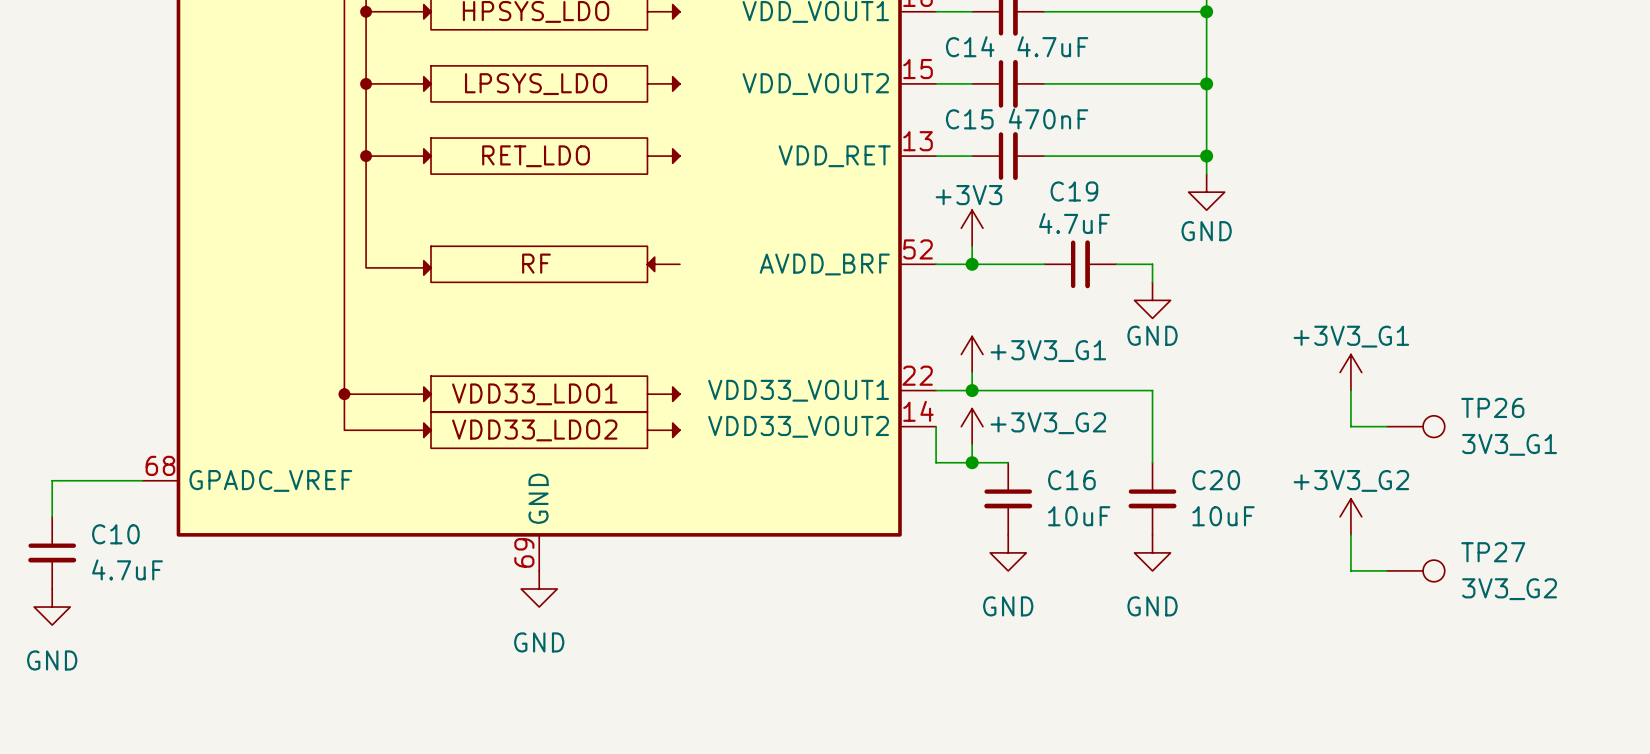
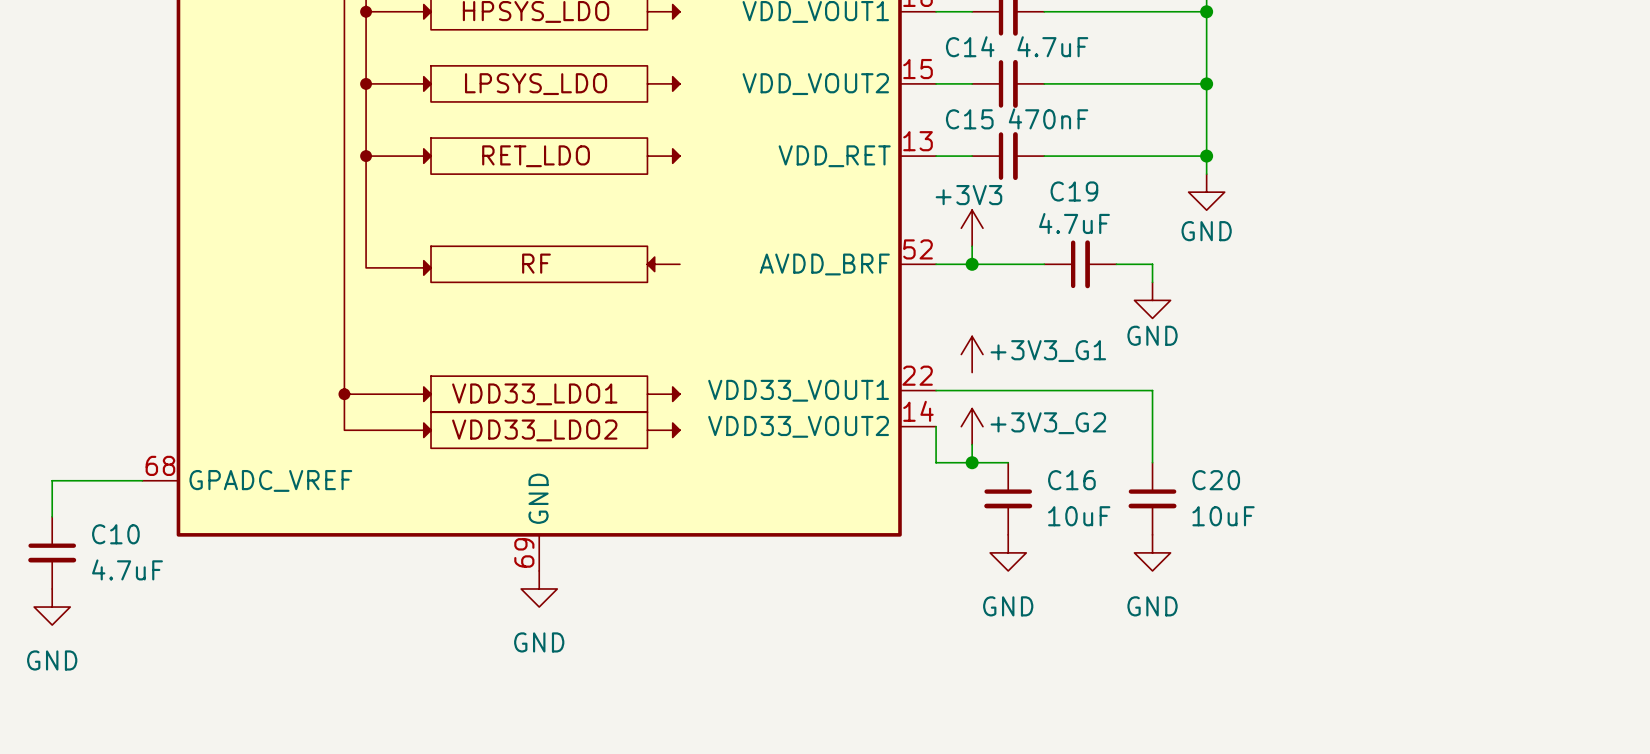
wire: (972, 372) (972, 390) -> none
power symbol: +3V3_G1 (1350, 372) -> none
junction: (972, 390) -> none
wire: (1350, 390) (1350, 426) (1387, 426) -> none
TP26: 3V3_G1 (1415, 426) -> none
power symbol: +3V3_G2 (1350, 516) -> none
wire: (1350, 534) (1350, 570) (1387, 570) -> none
TP27: 3V3_G2 (1415, 570) -> none

